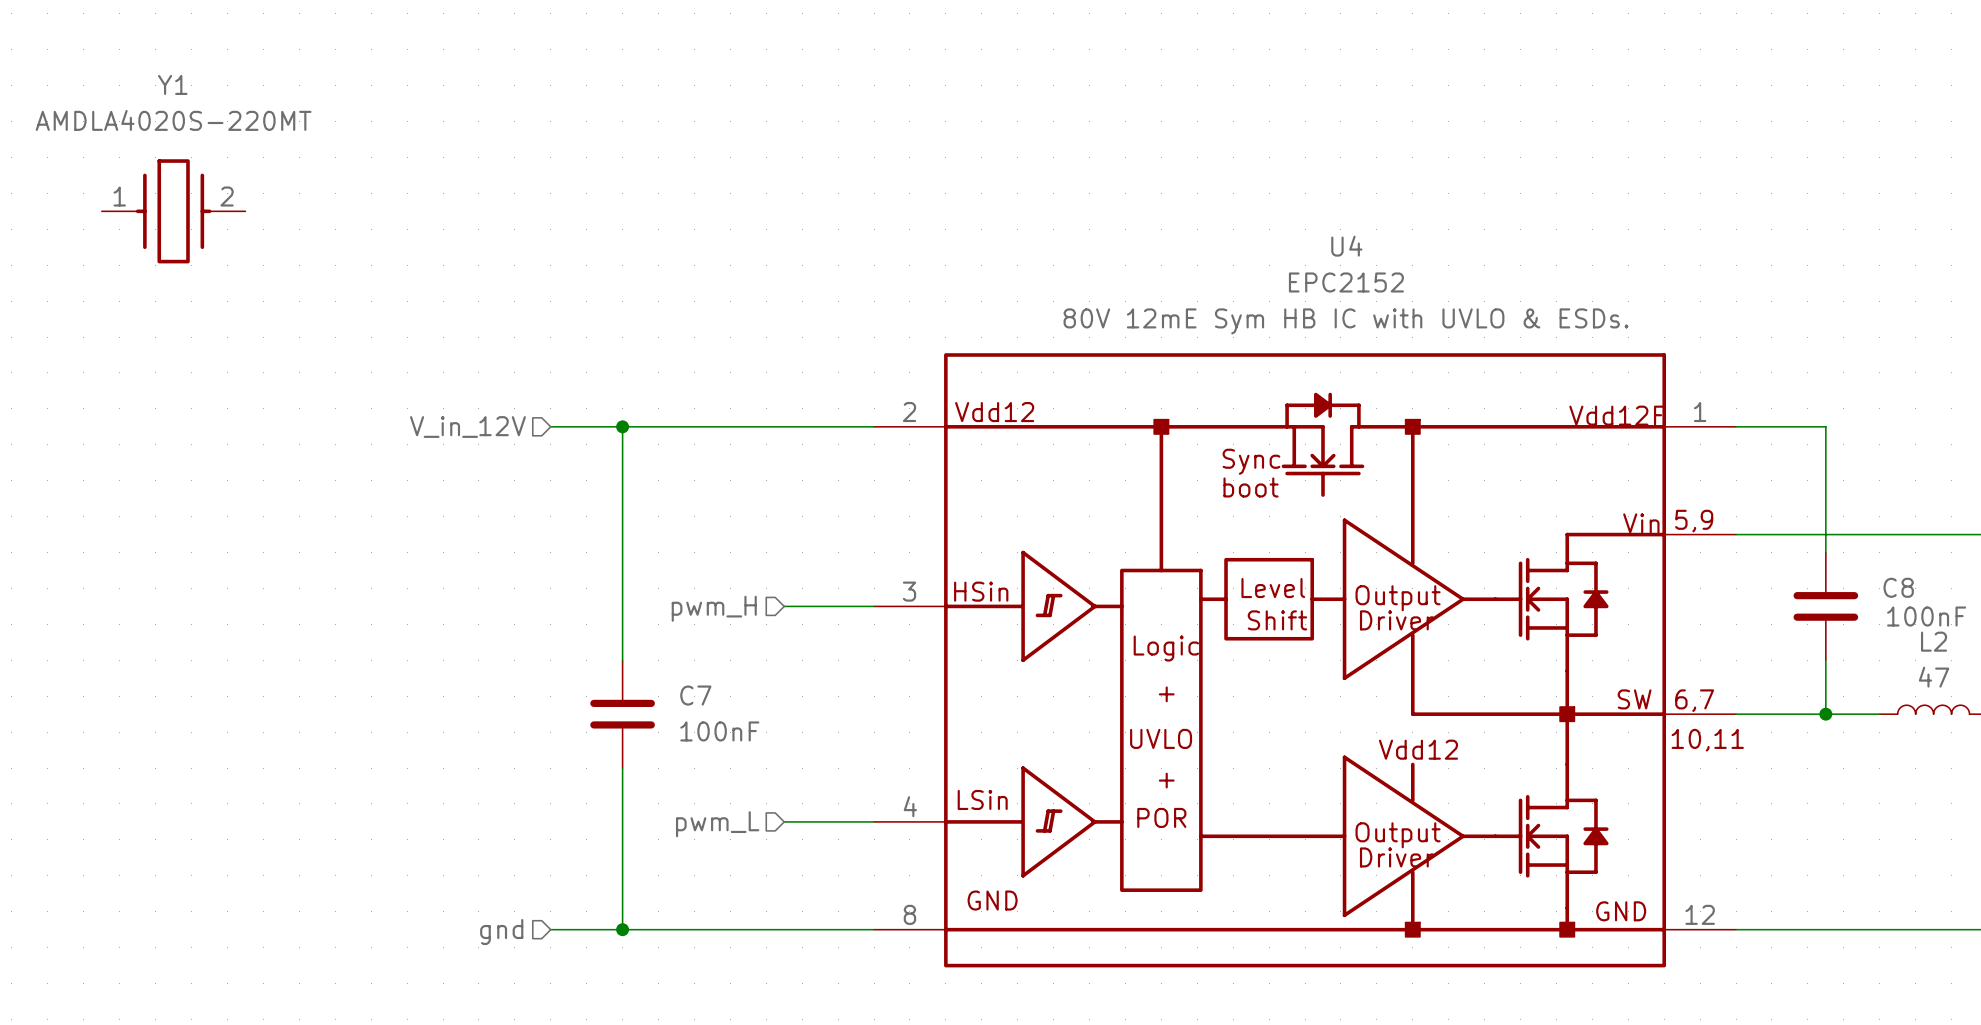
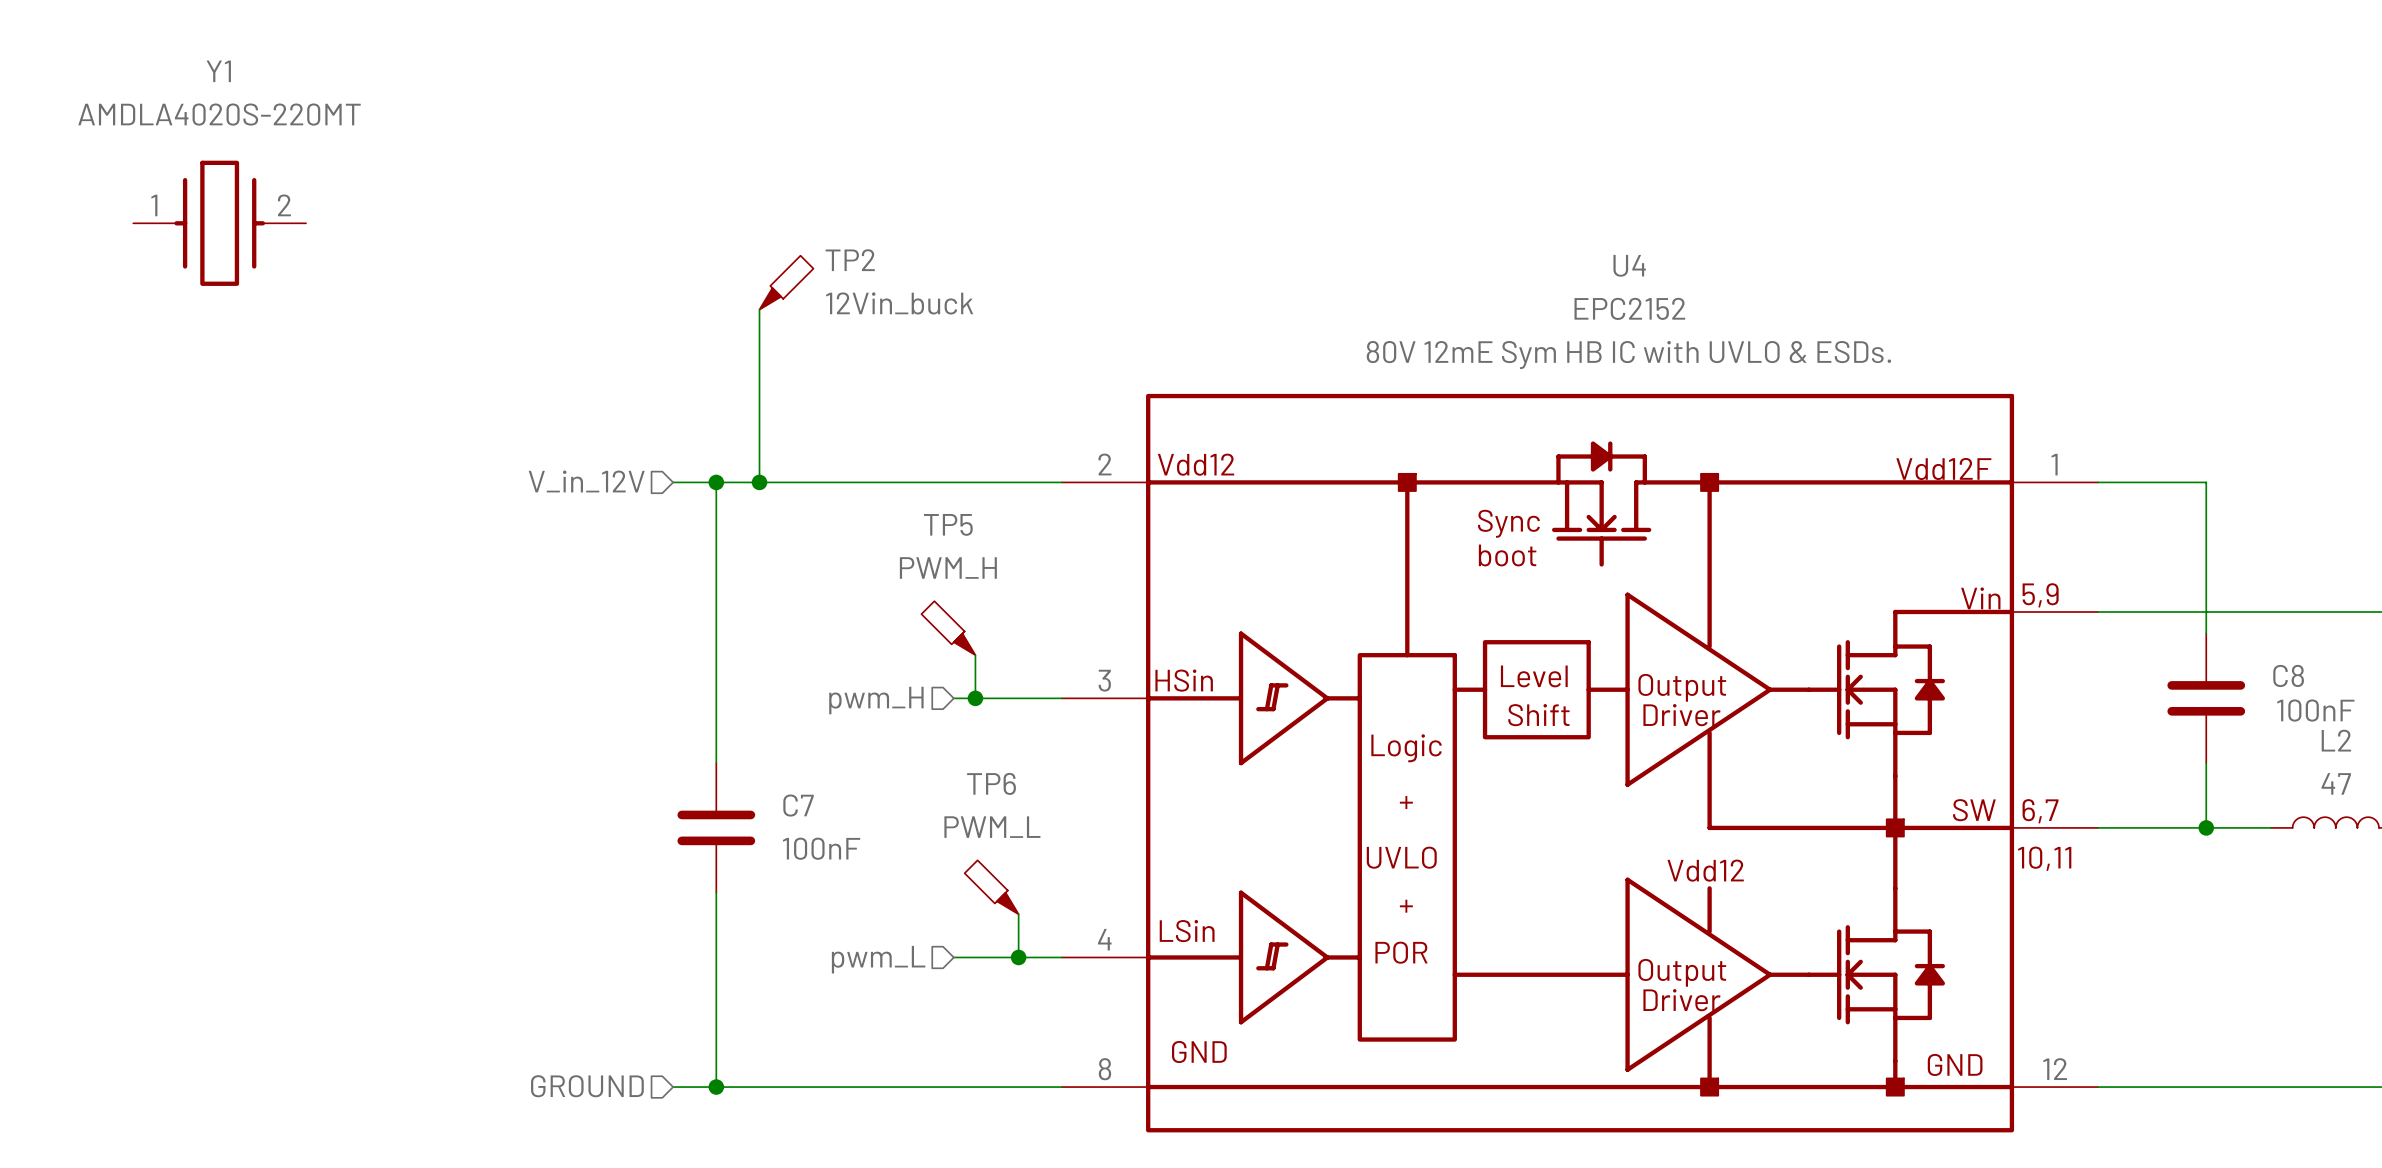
TP2: none -> 12Vin_buck (786, 282)
wire: none -> (716, 482) (716, 763)
junction: none -> (716, 482)
wire: (622, 426) (622, 660) -> (759, 482) (759, 309)
TP5: none -> PWM_H (948, 628)
wire: none -> (975, 655) (975, 698)
junction: none -> (975, 698)
C7 position: (622, 714) -> (716, 827)
TP6: none -> PWM_L (991, 887)
wire: (622, 768) (622, 929) -> (716, 892) (716, 1087)
wire: none -> (1018, 914) (1018, 957)
junction: none -> (1018, 957)
junction position: (622, 929) -> (716, 1087)
hierarchical label: gnd (501, 932) -> GROUND (587, 1086)

